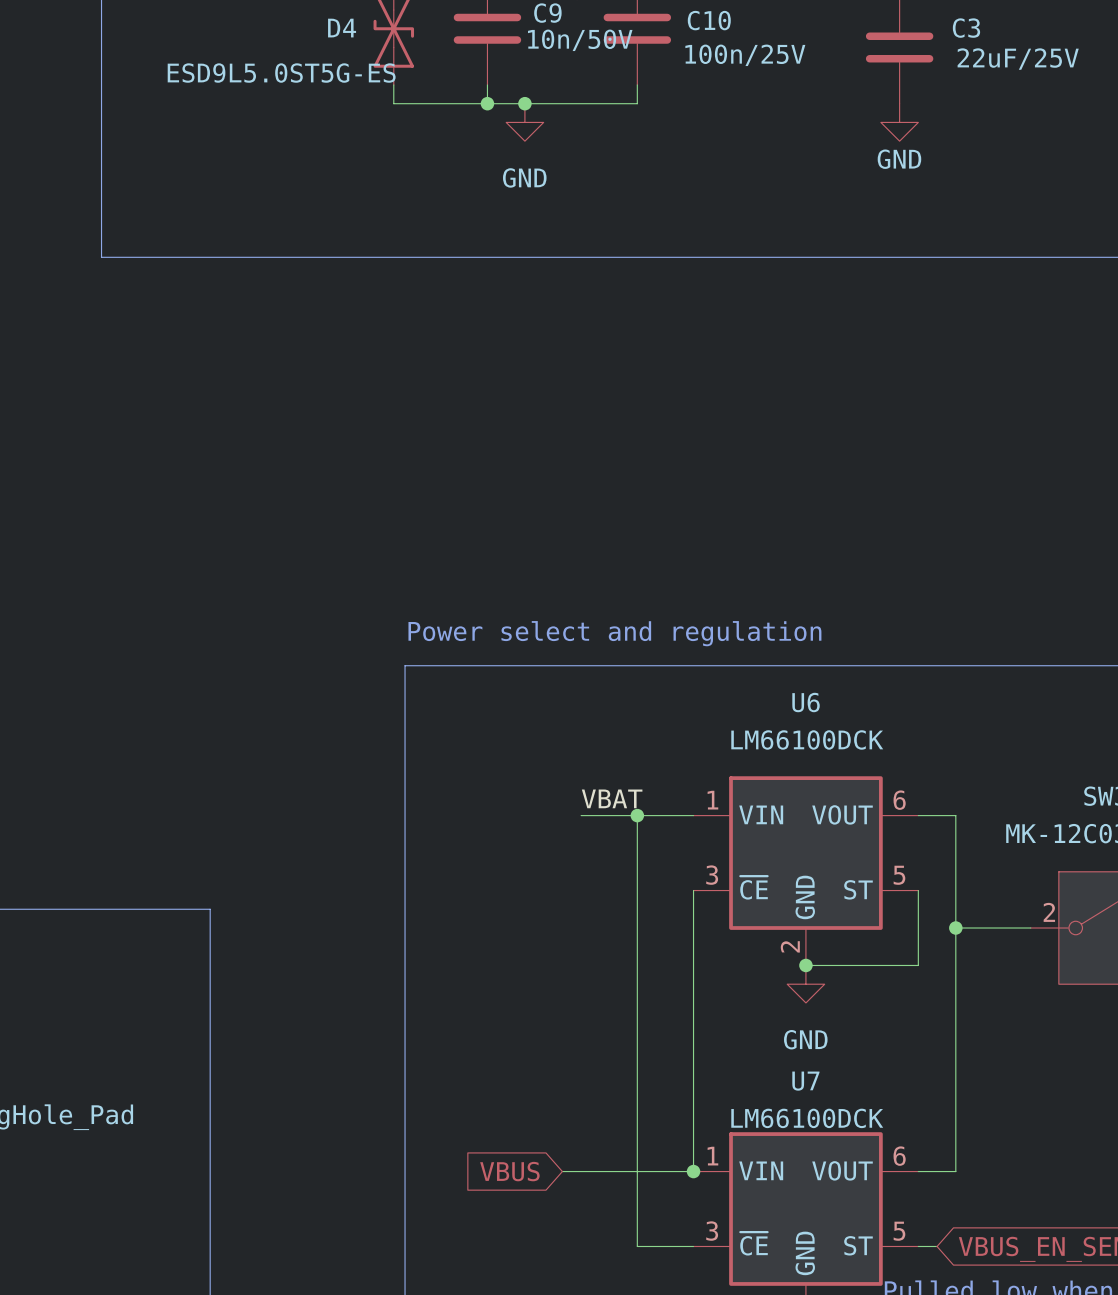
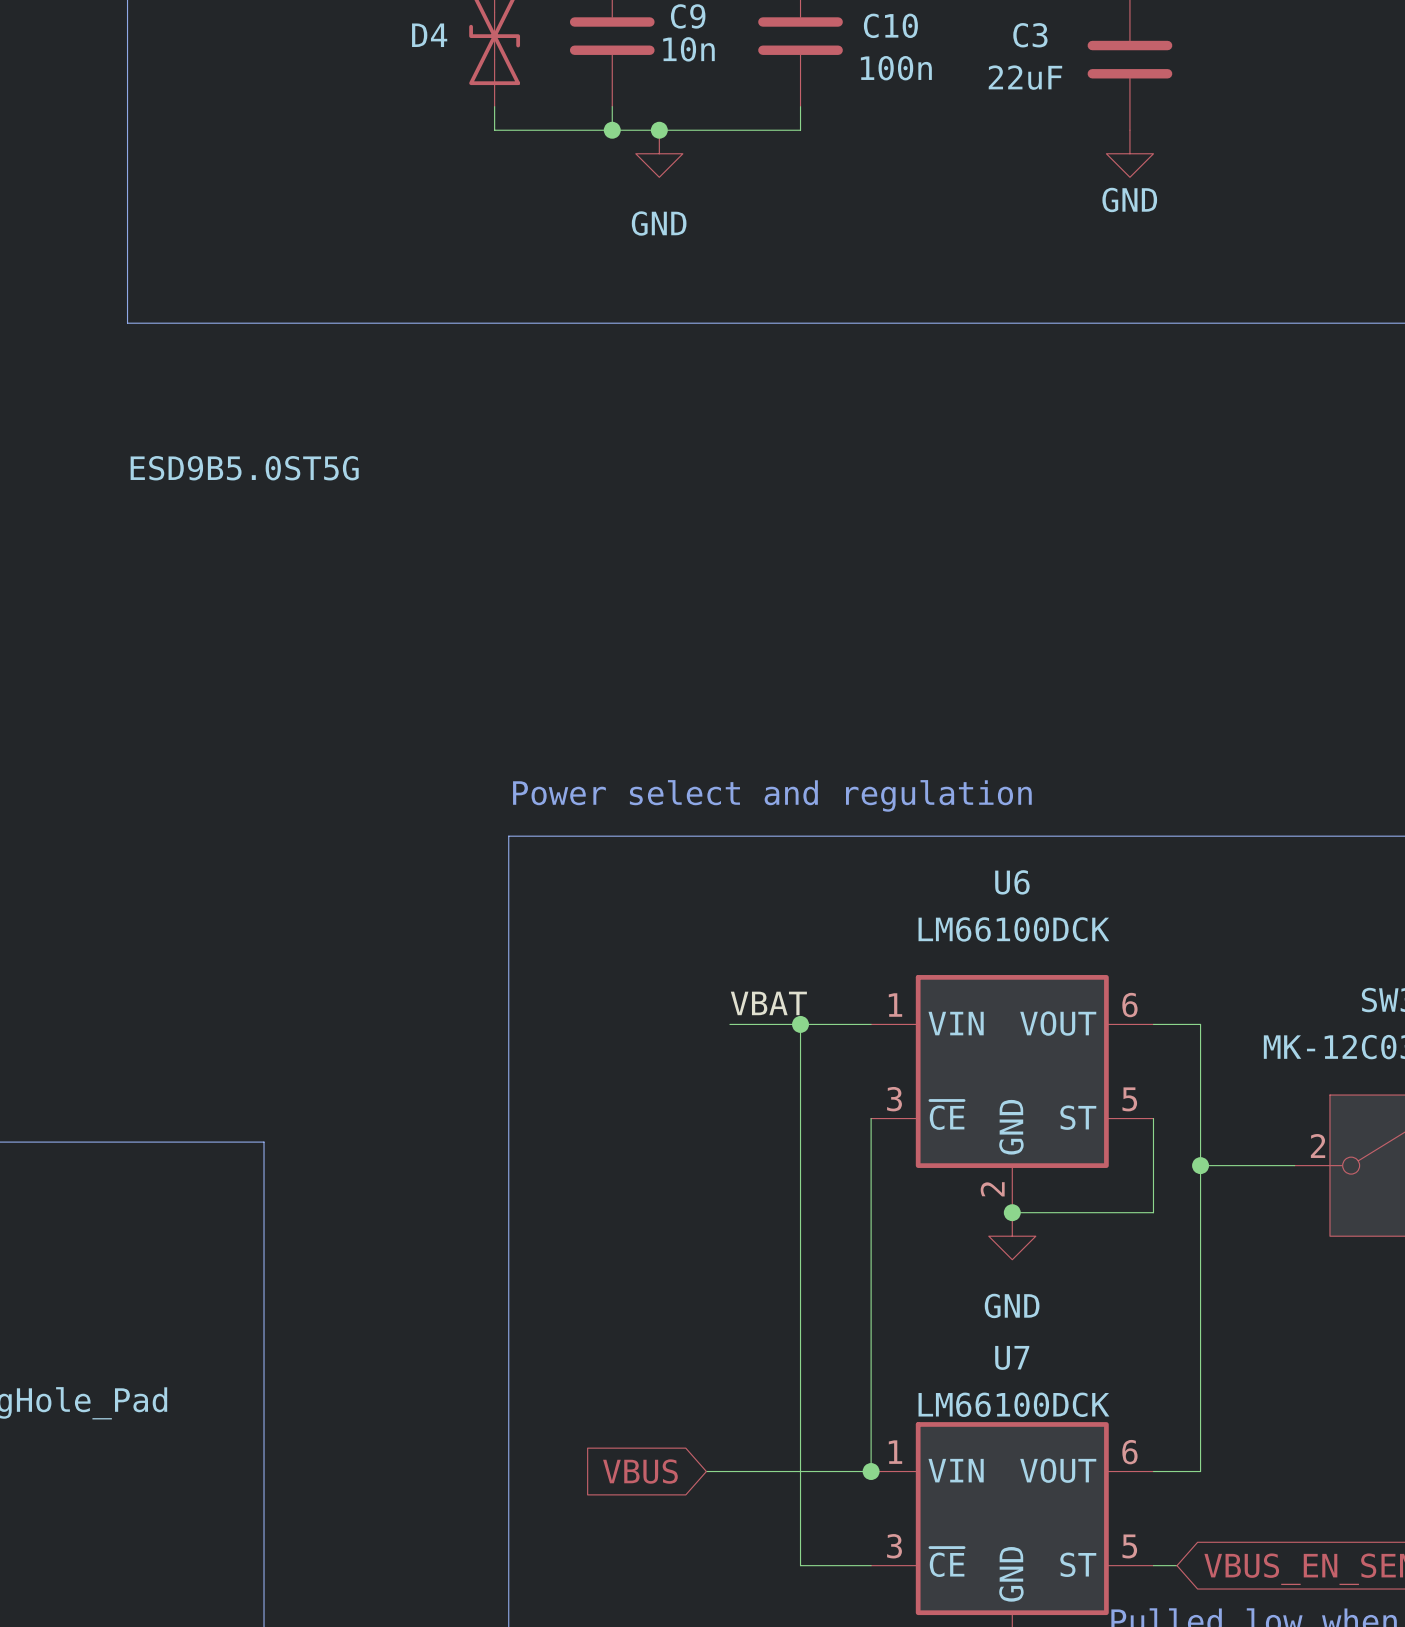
C3 name position: C3 (966, 28) -> C3 (1030, 35)
C9 value: 10n/50V (580, 40) -> 10n (688, 49)
C10 value: 100n/25V (745, 55) -> 100n (896, 68)
C3 value: 22uF/25V (1018, 59) -> 22uF (1025, 77)
D4 value: ESD9L5.0ST5G-ES (281, 73) -> ESD9B5.0ST5G (244, 468)

